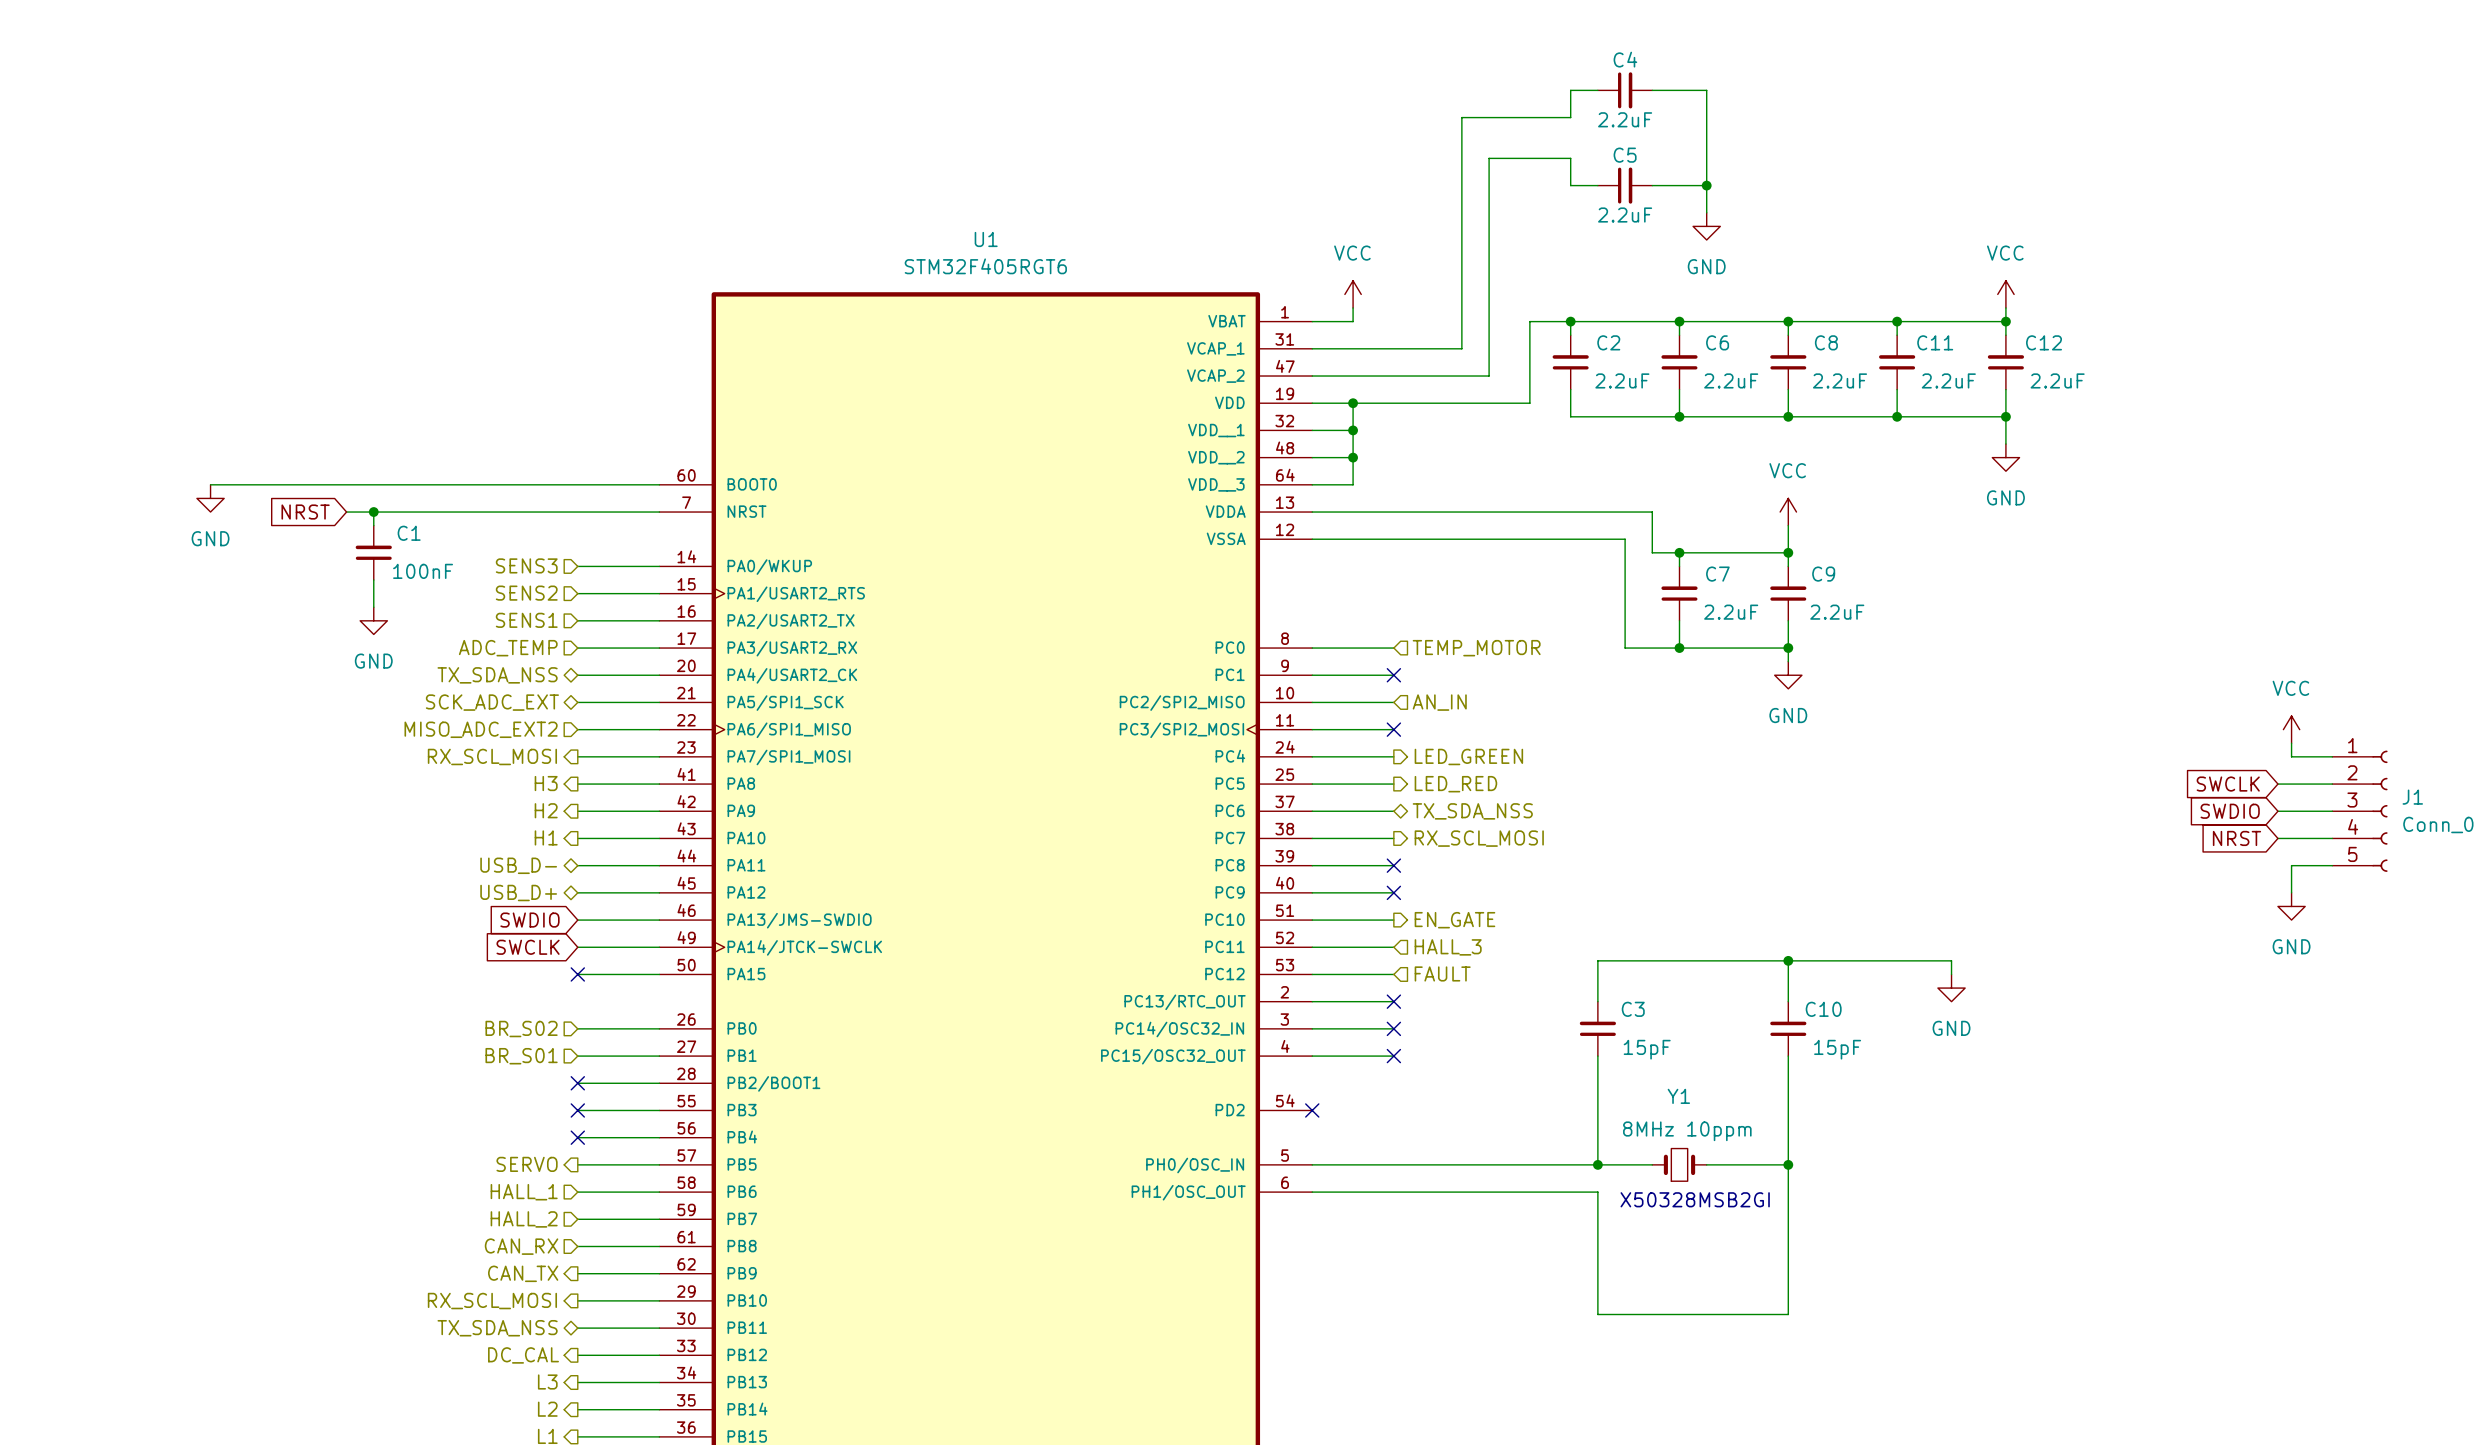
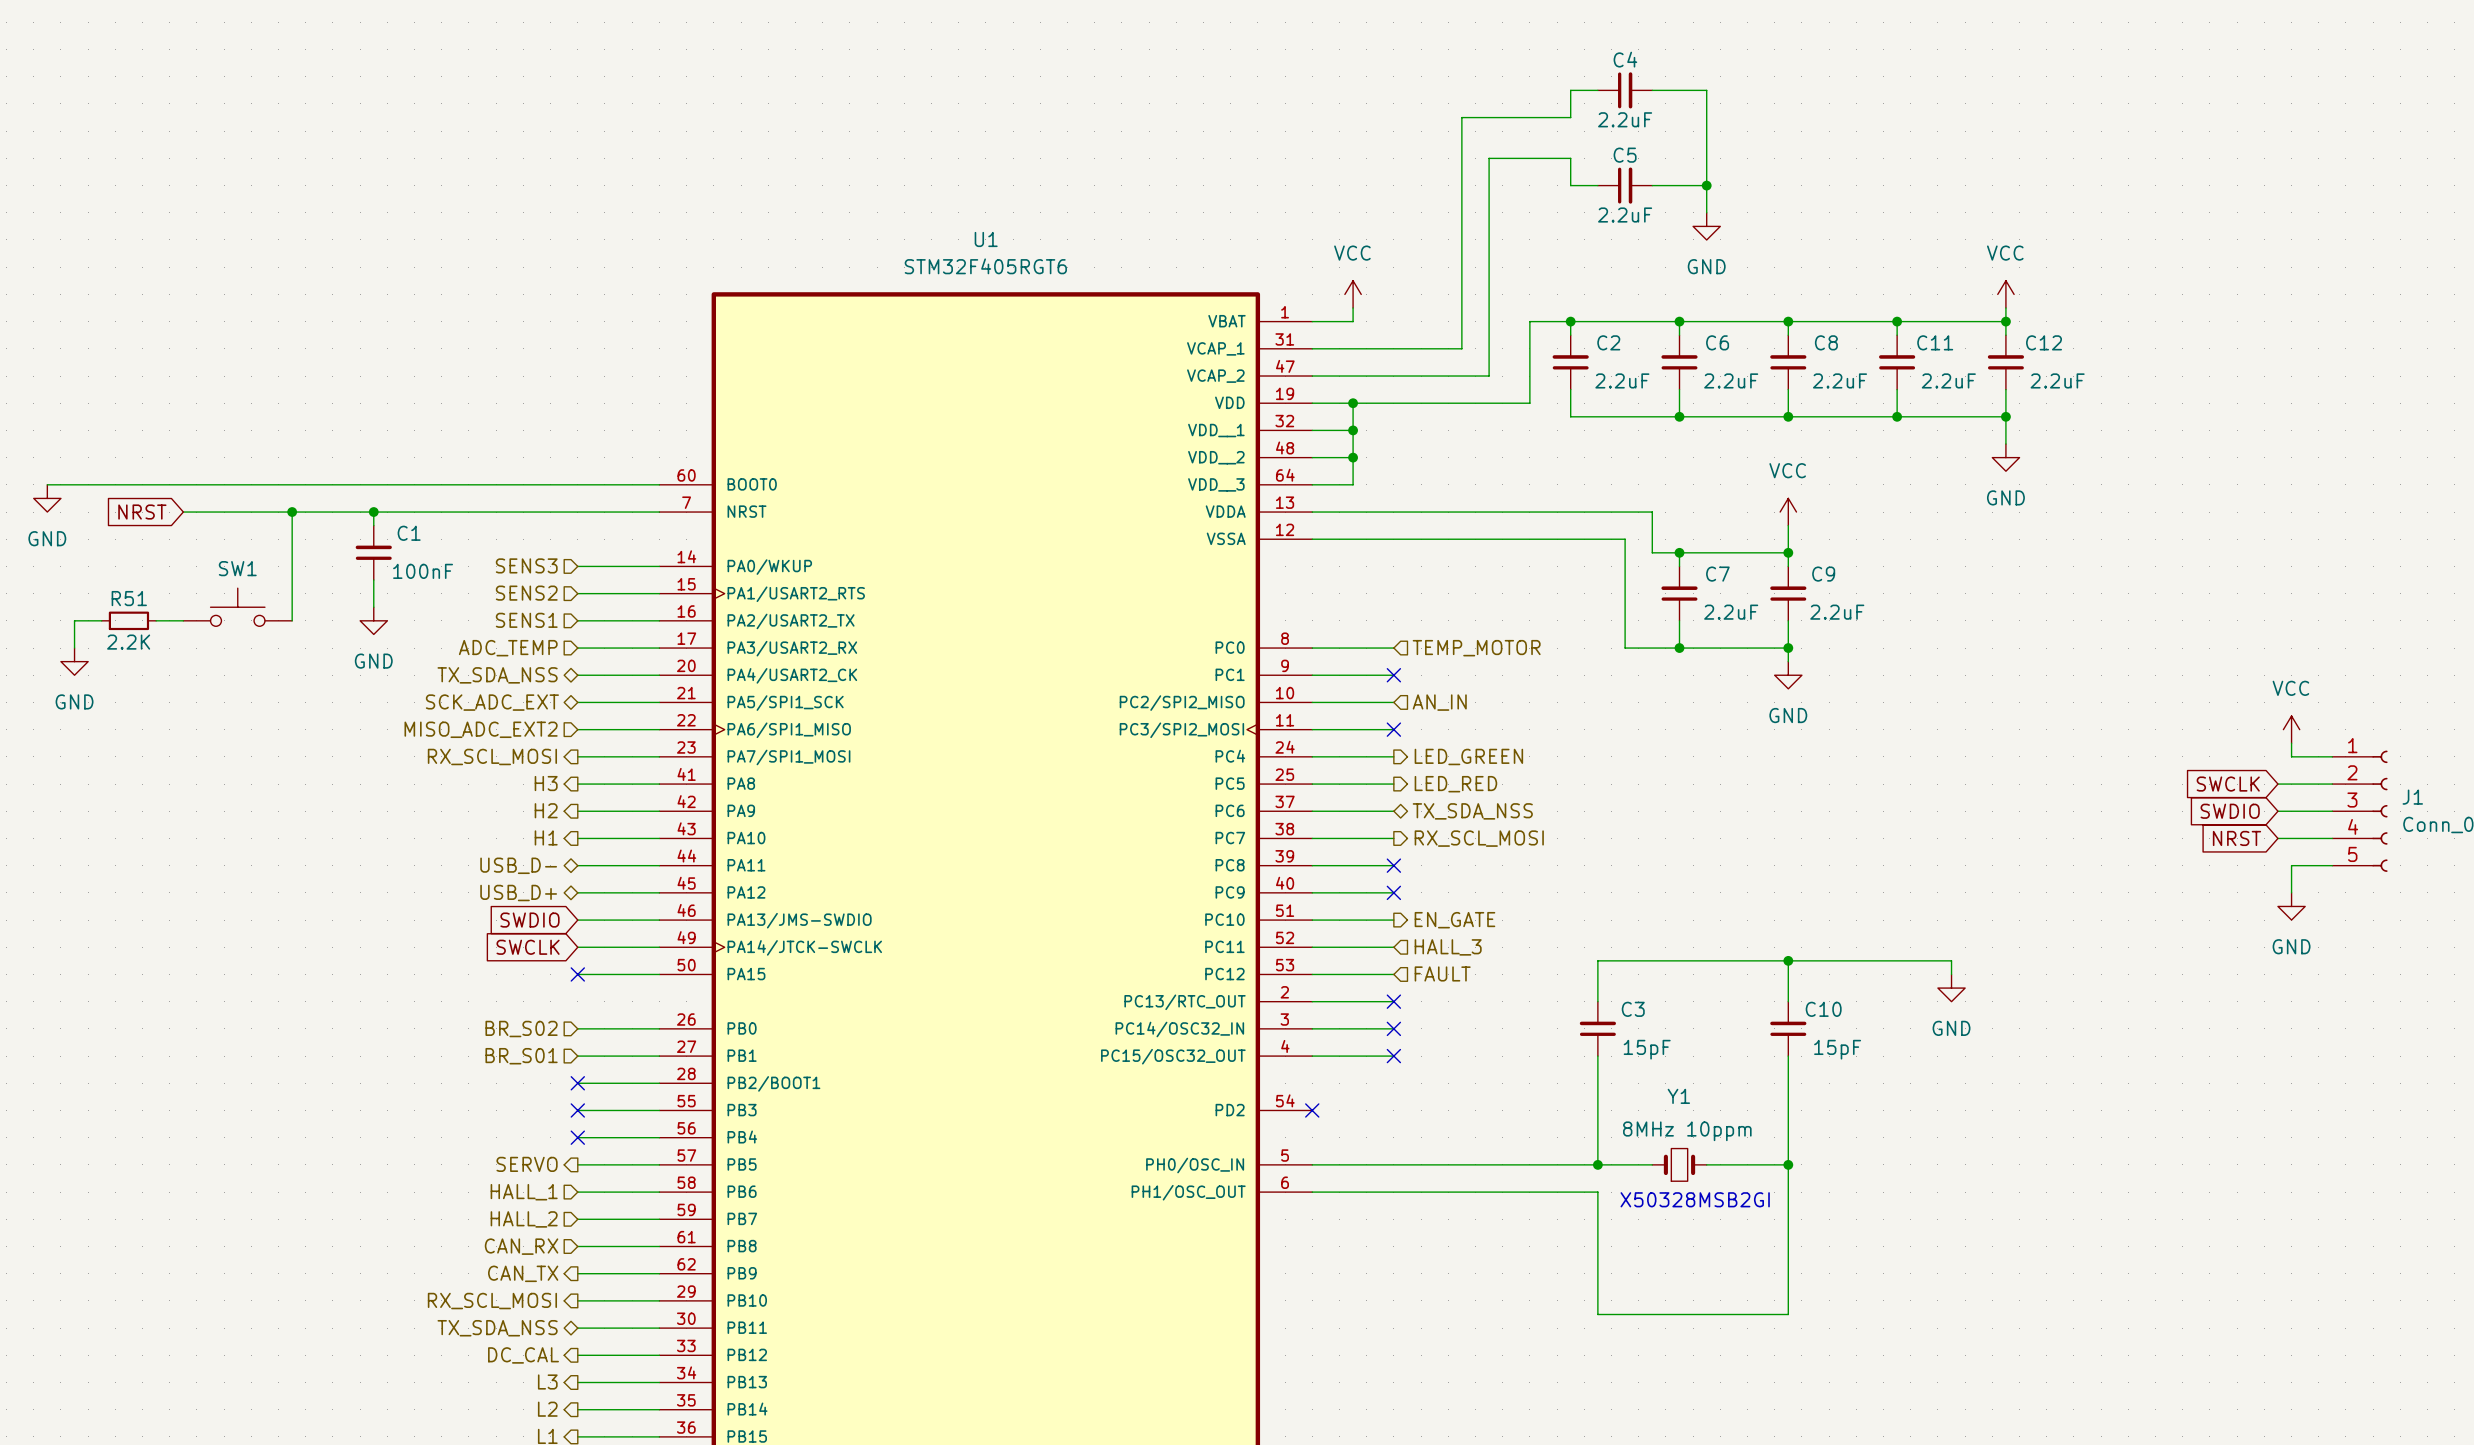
wire: none -> (47, 484) (210, 484)
power symbol: none -> GND (47, 498)
power symbol: GND (210, 498) -> none
wire: none -> (183, 512) (346, 512)
wire: none -> (292, 512) (292, 620)
junction: none -> (292, 512)
global label position: NRST (305, 512) -> NRST (142, 512)
SW1: none -> (237, 607)
wire: none -> (101, 620) (74, 620) (74, 648)
R51: none -> 2.2K (128, 620)
wire: none -> (156, 620) (183, 620)
power symbol: none -> GND (74, 661)

